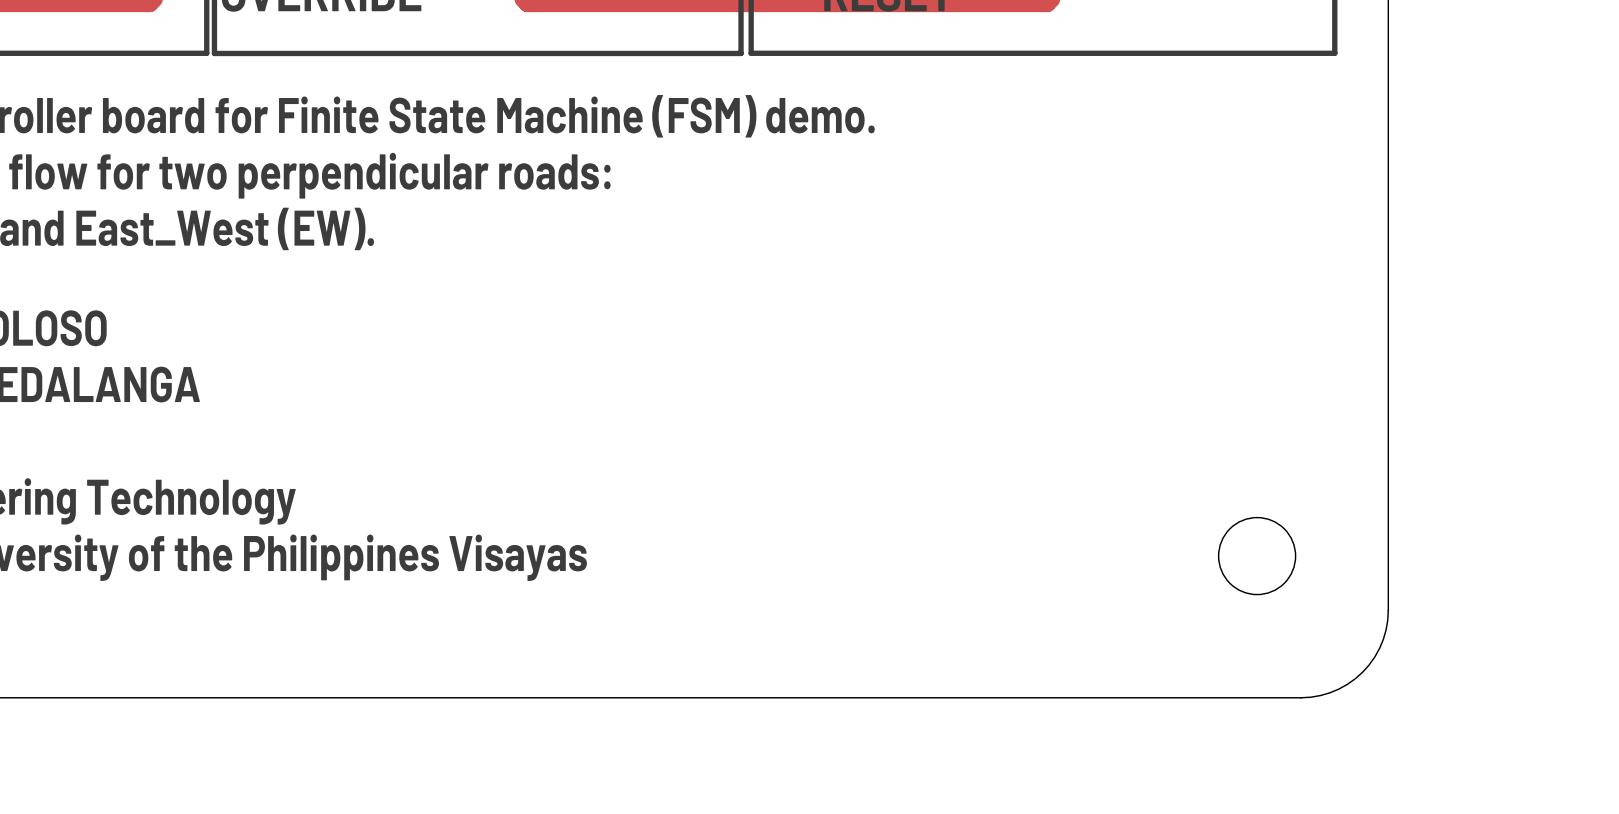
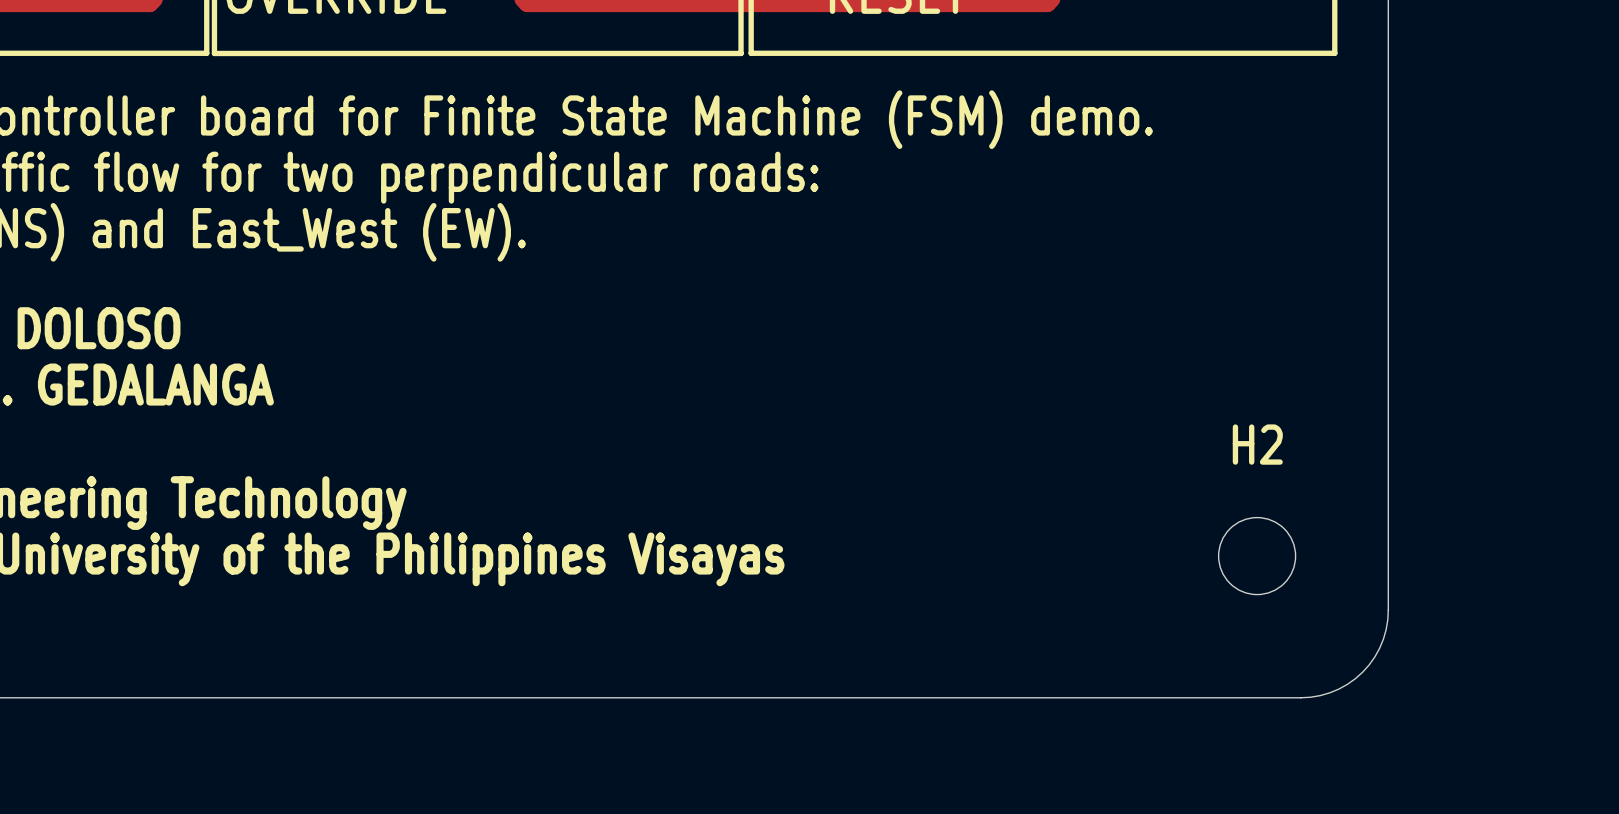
H2 name: none -> H2 (1257, 444)

